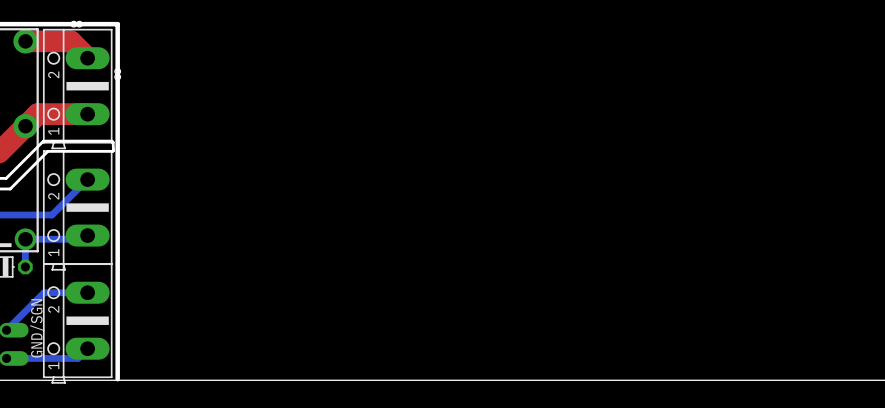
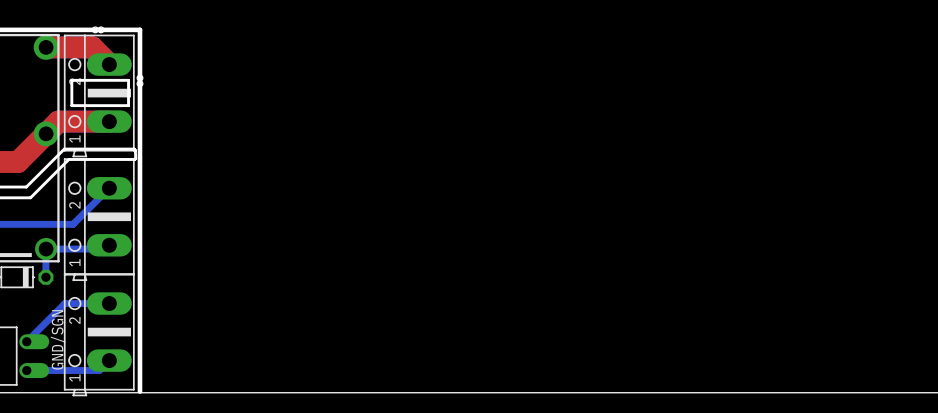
board edge: none -> (71, 80) (128, 80) (128, 105) (71, 105) (71, 80)

